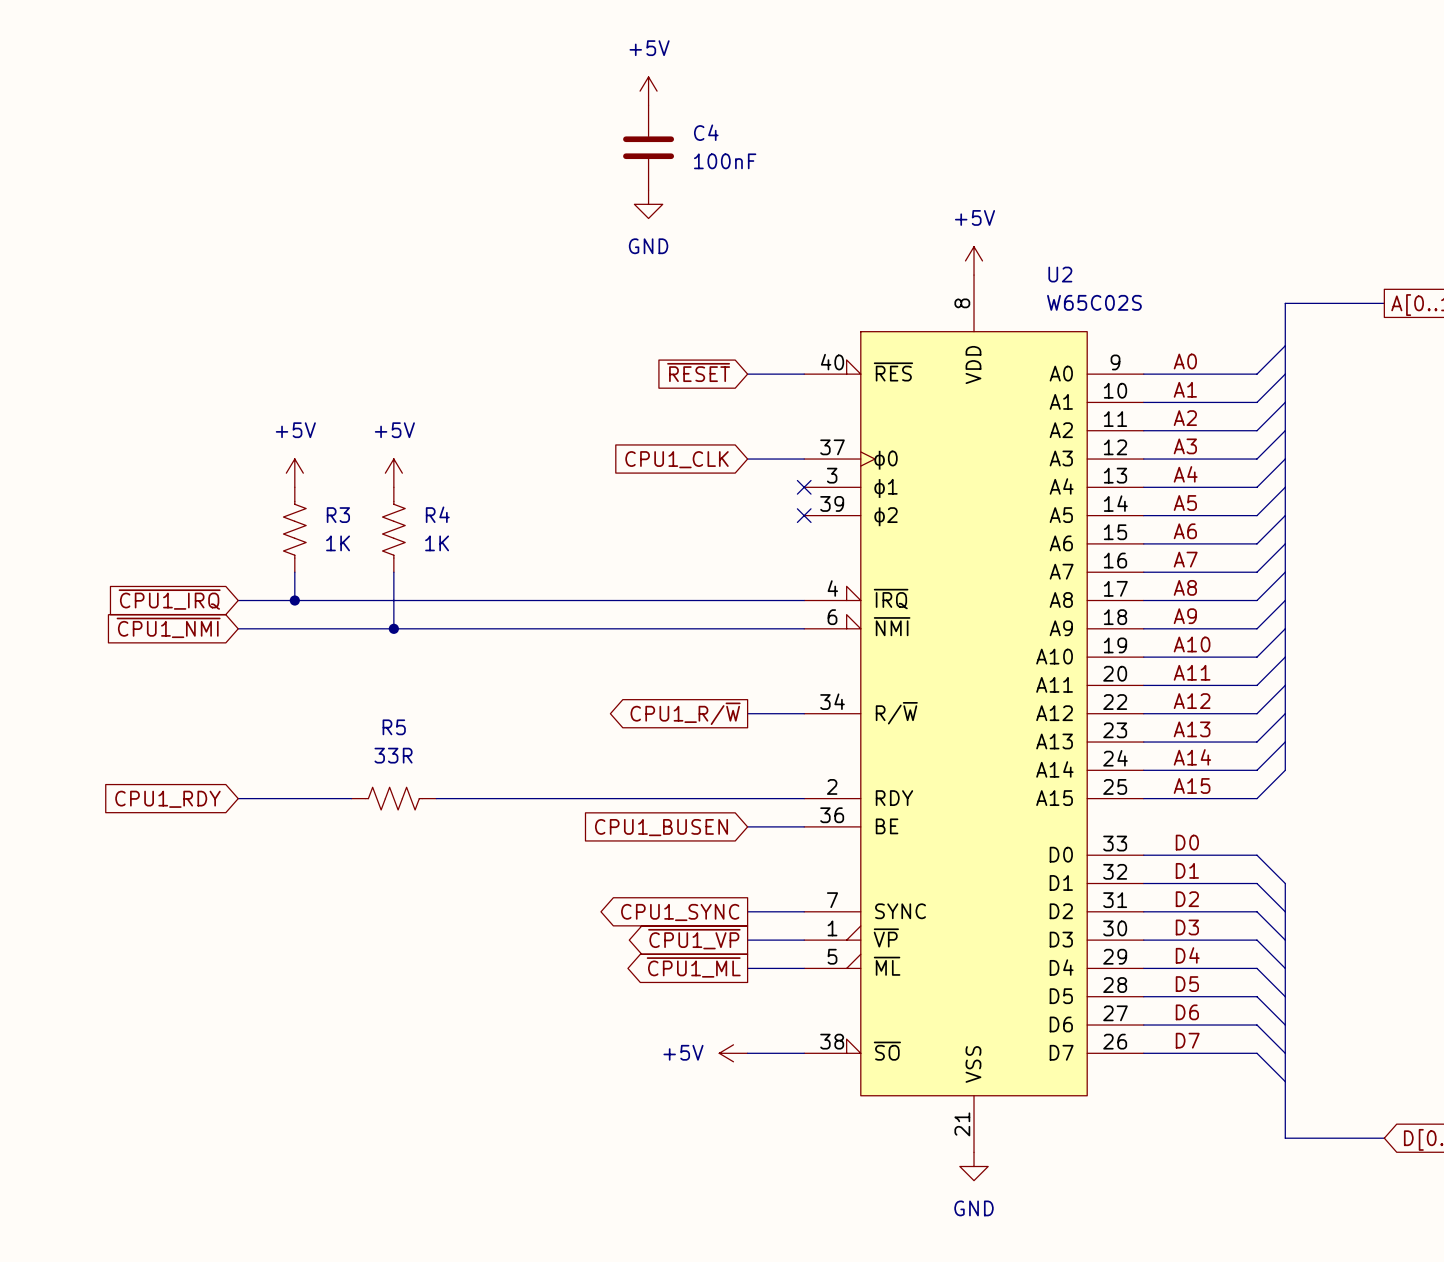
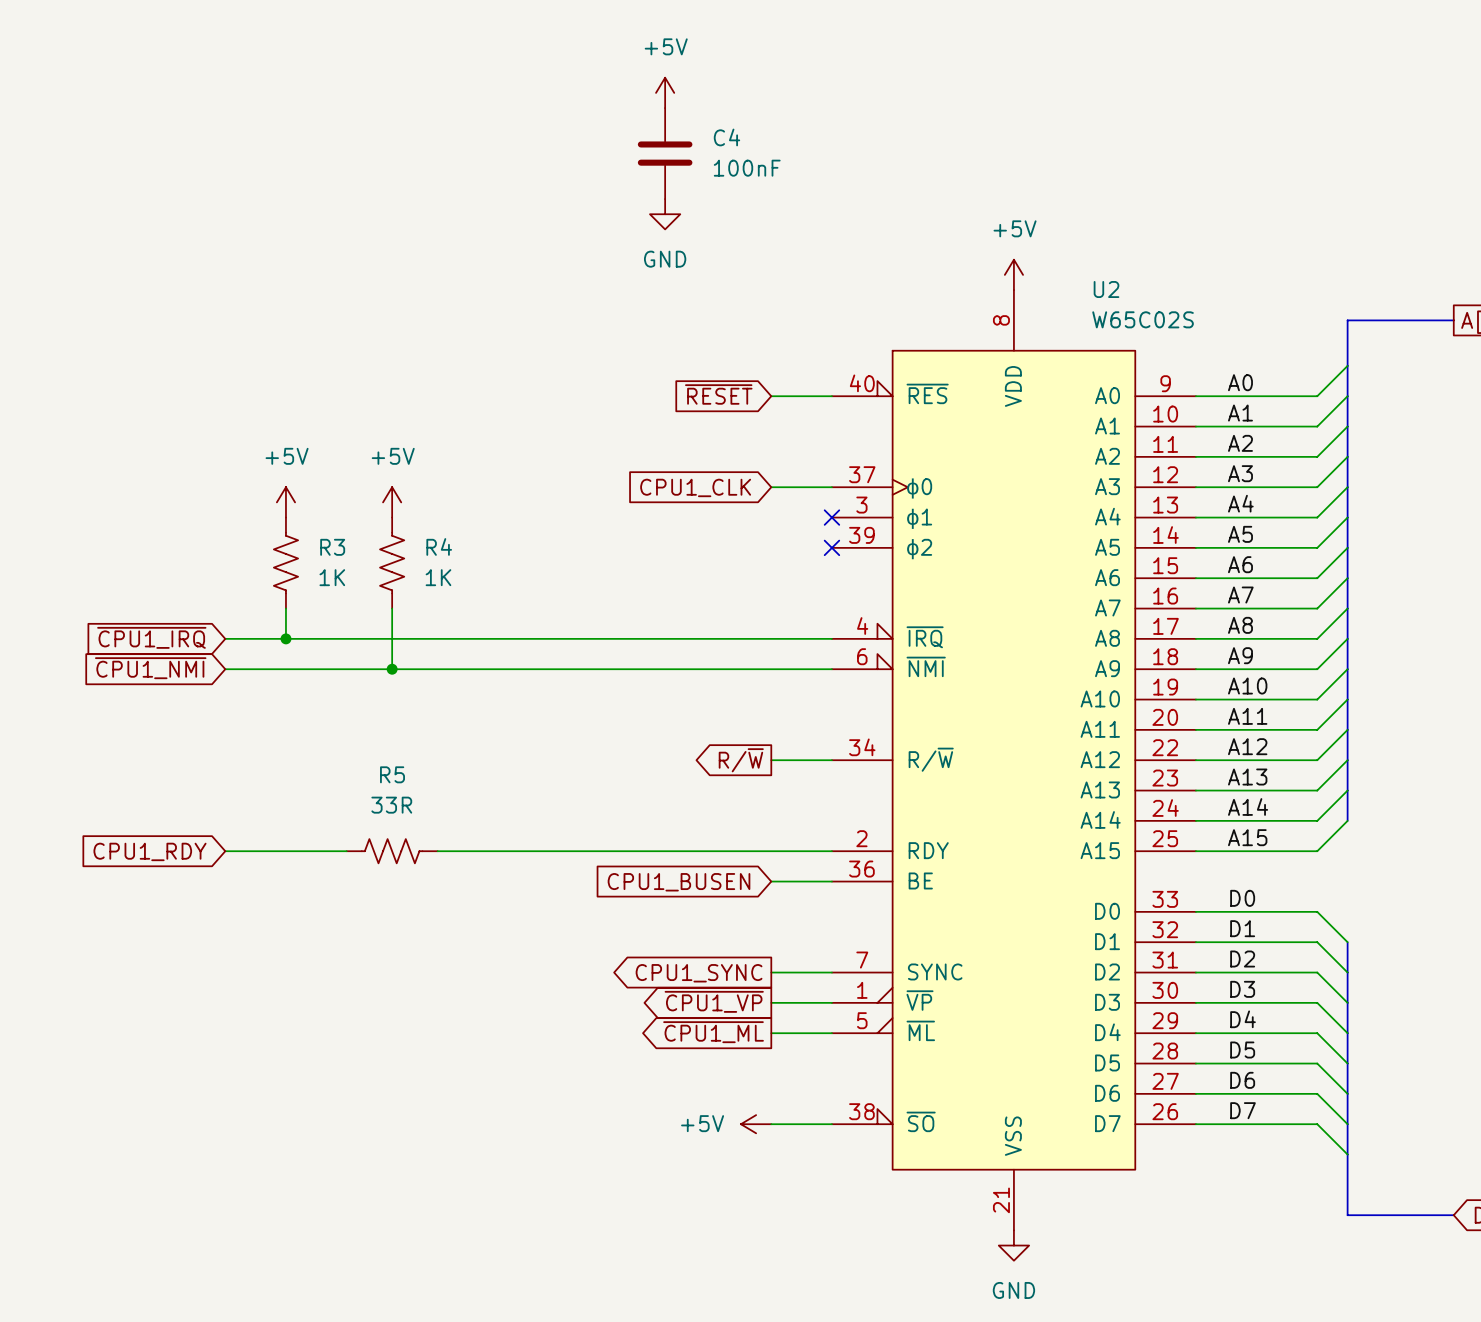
global label: CPU1_R/~{W} (685, 713) -> R/~{W} (741, 760)

